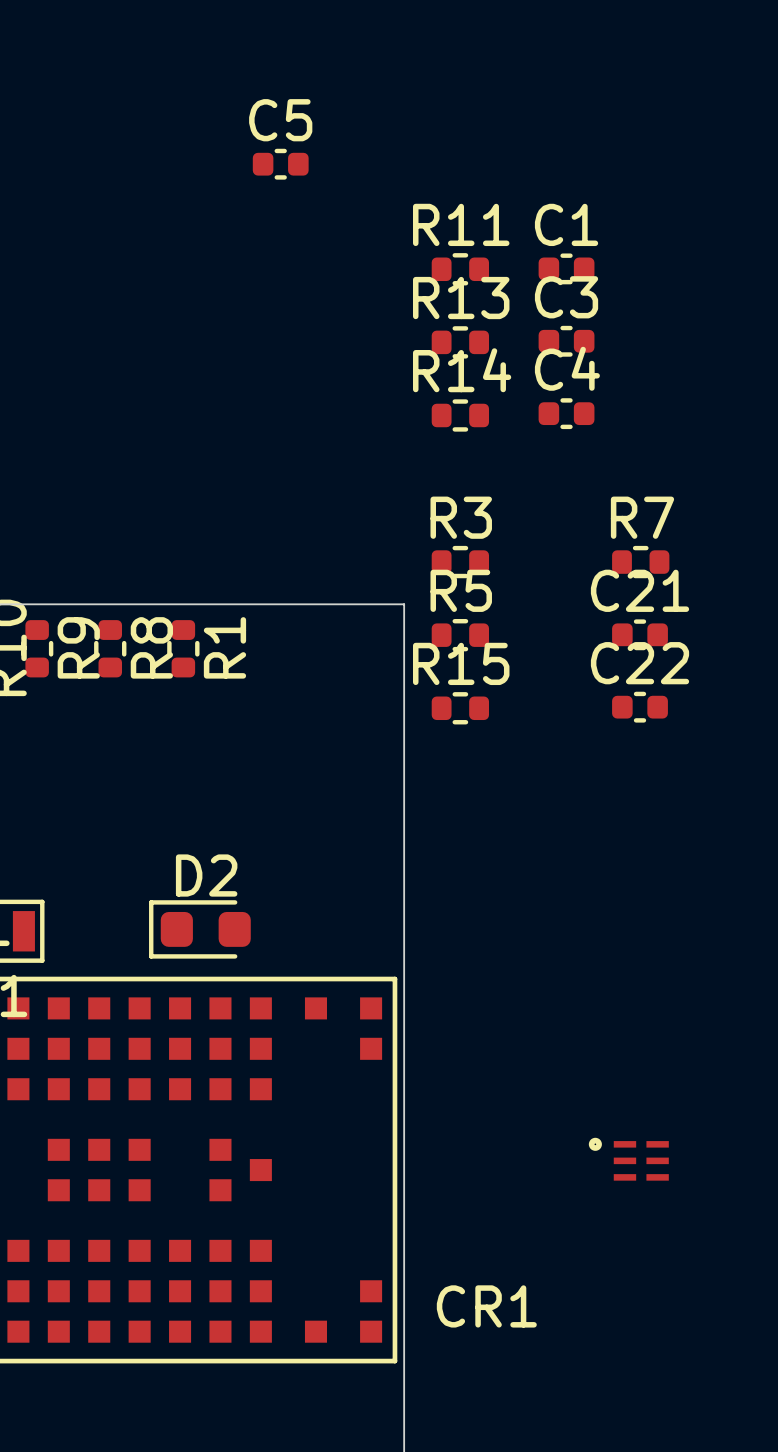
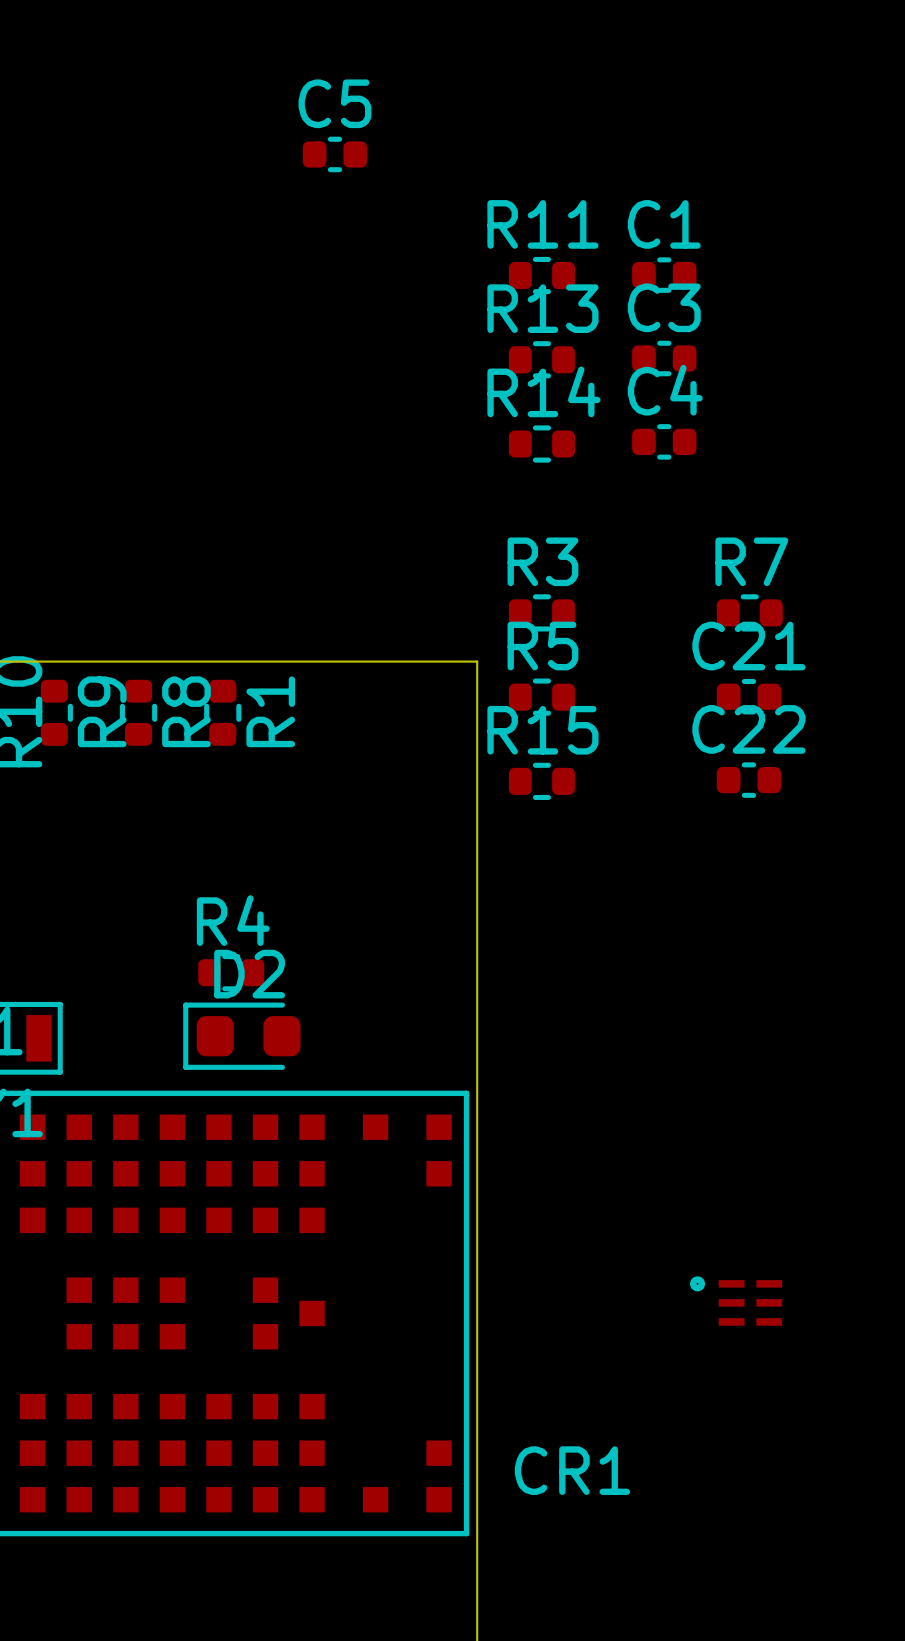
R4: none -> (231, 972)

